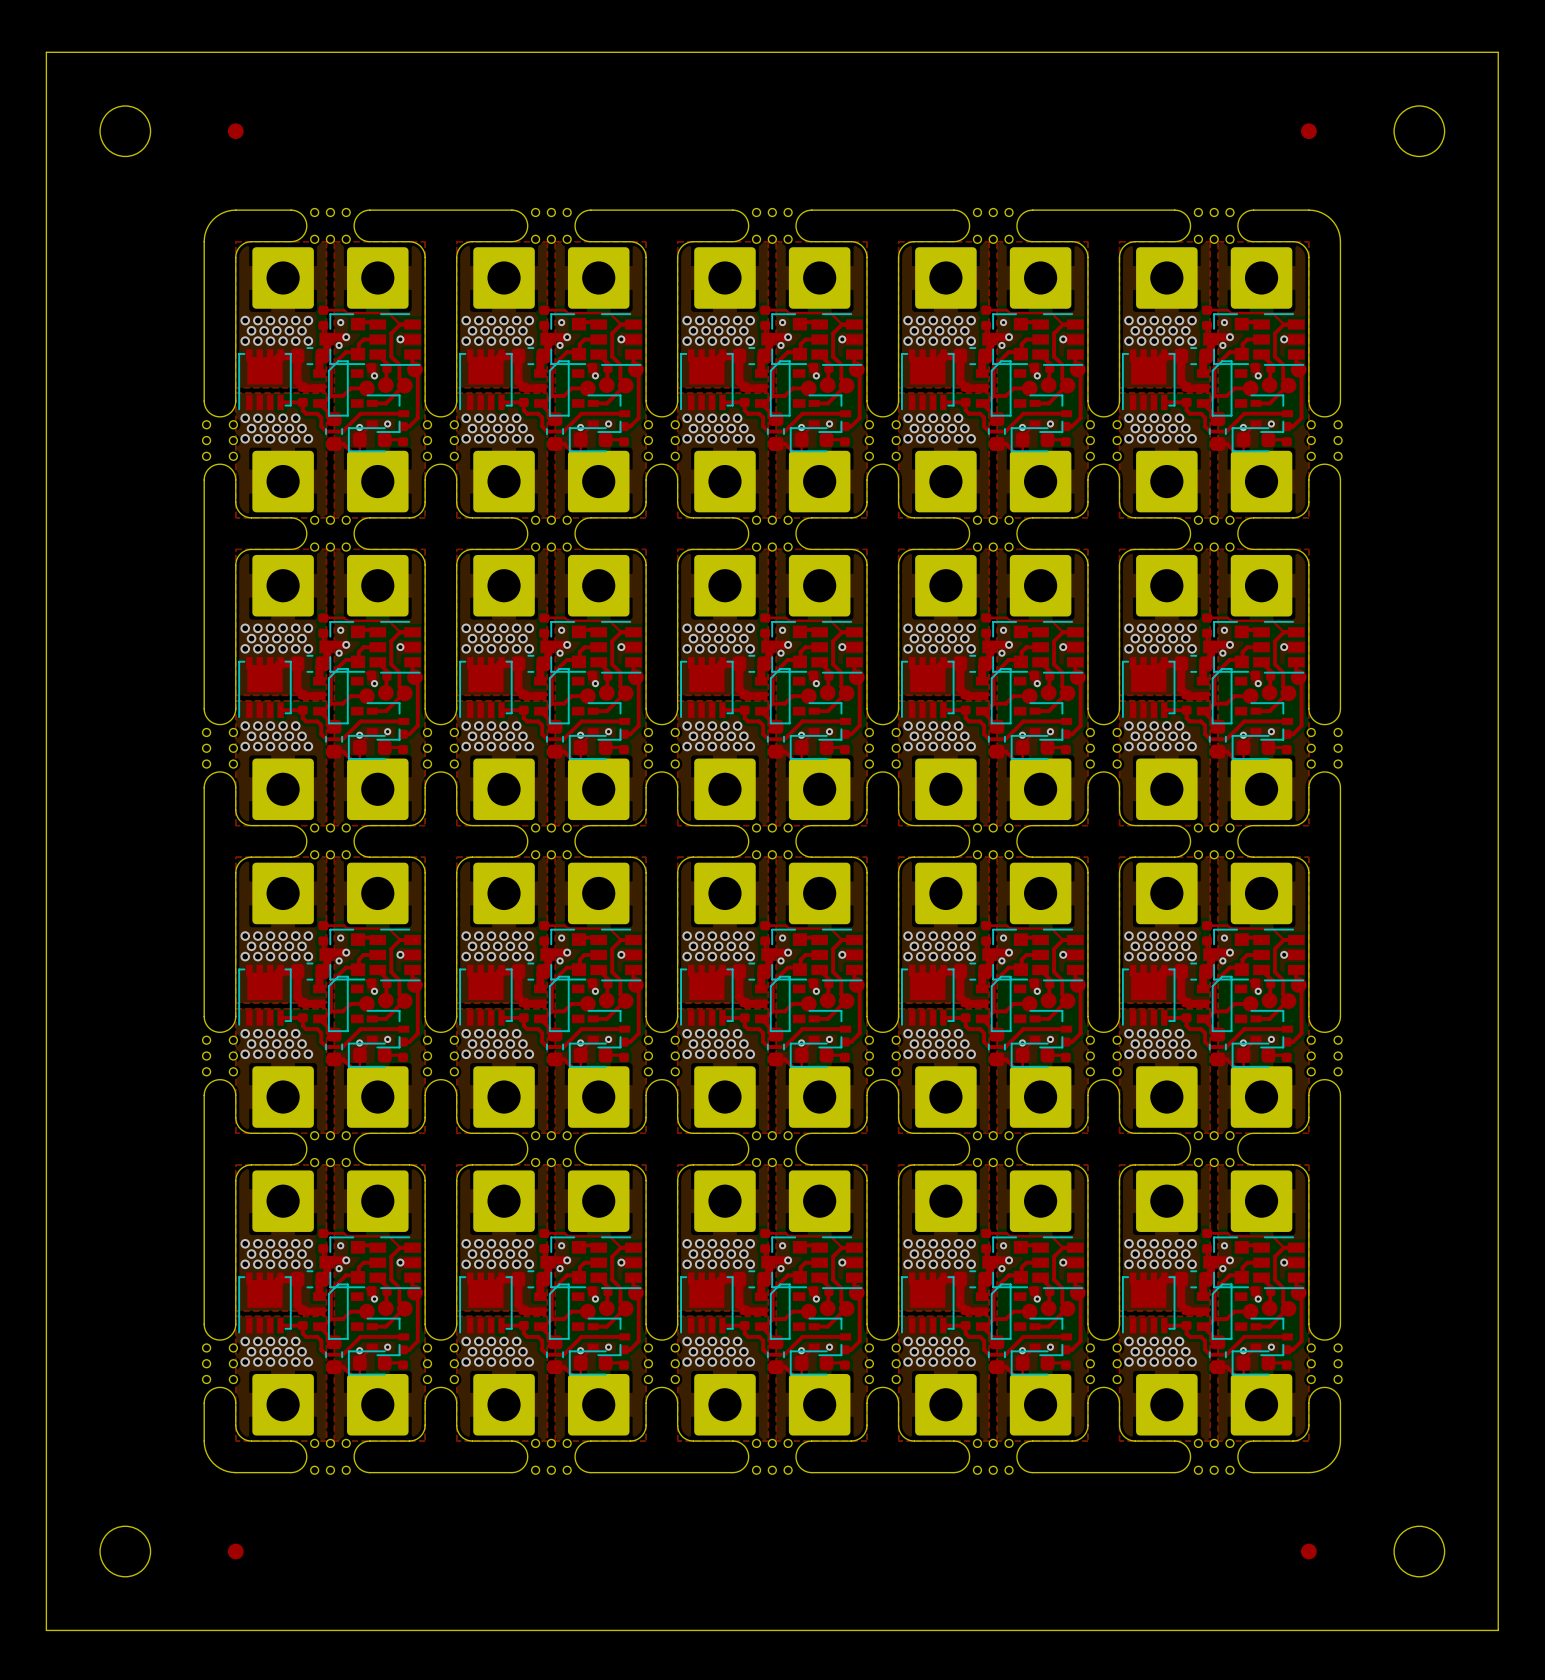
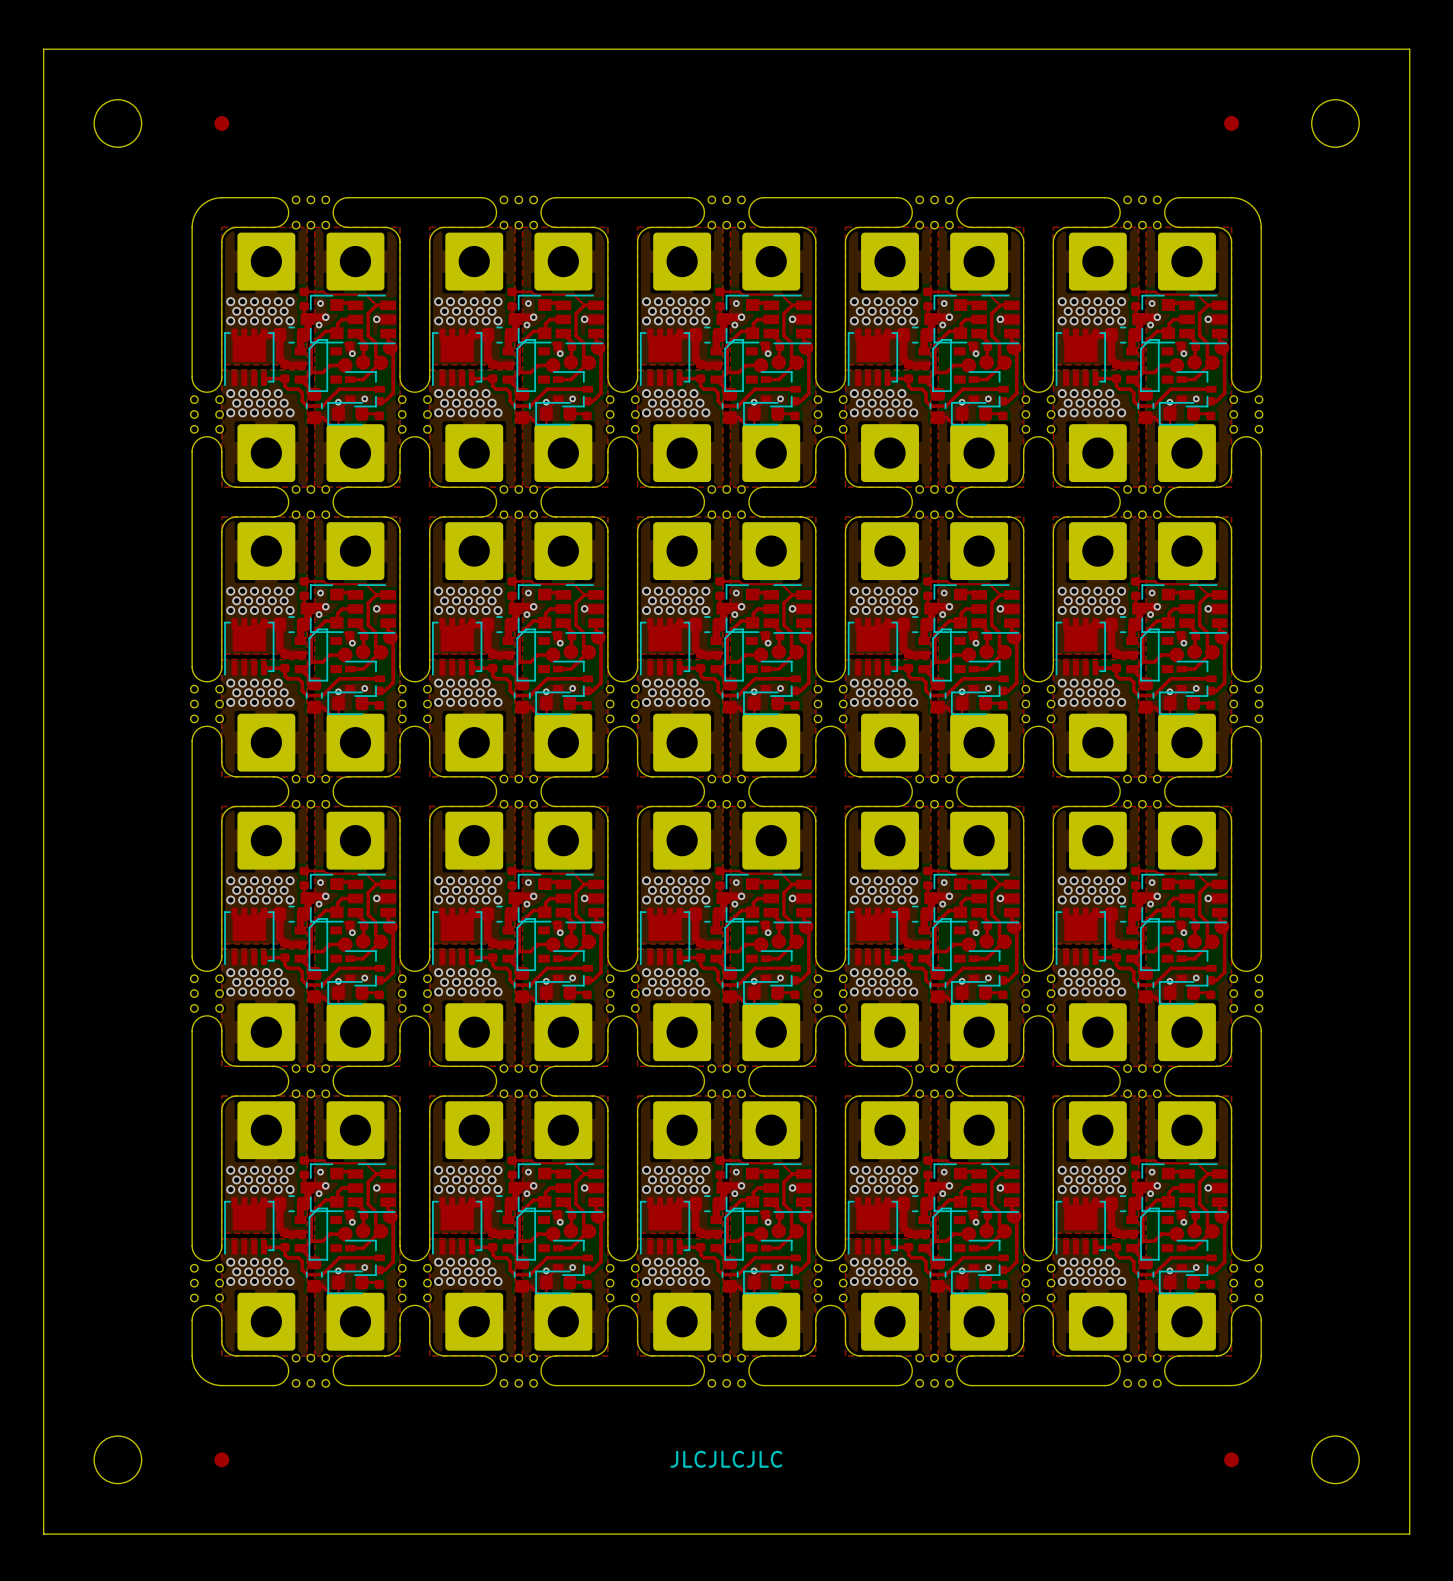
text: none -> JLCJLCJLC (726, 1459)

